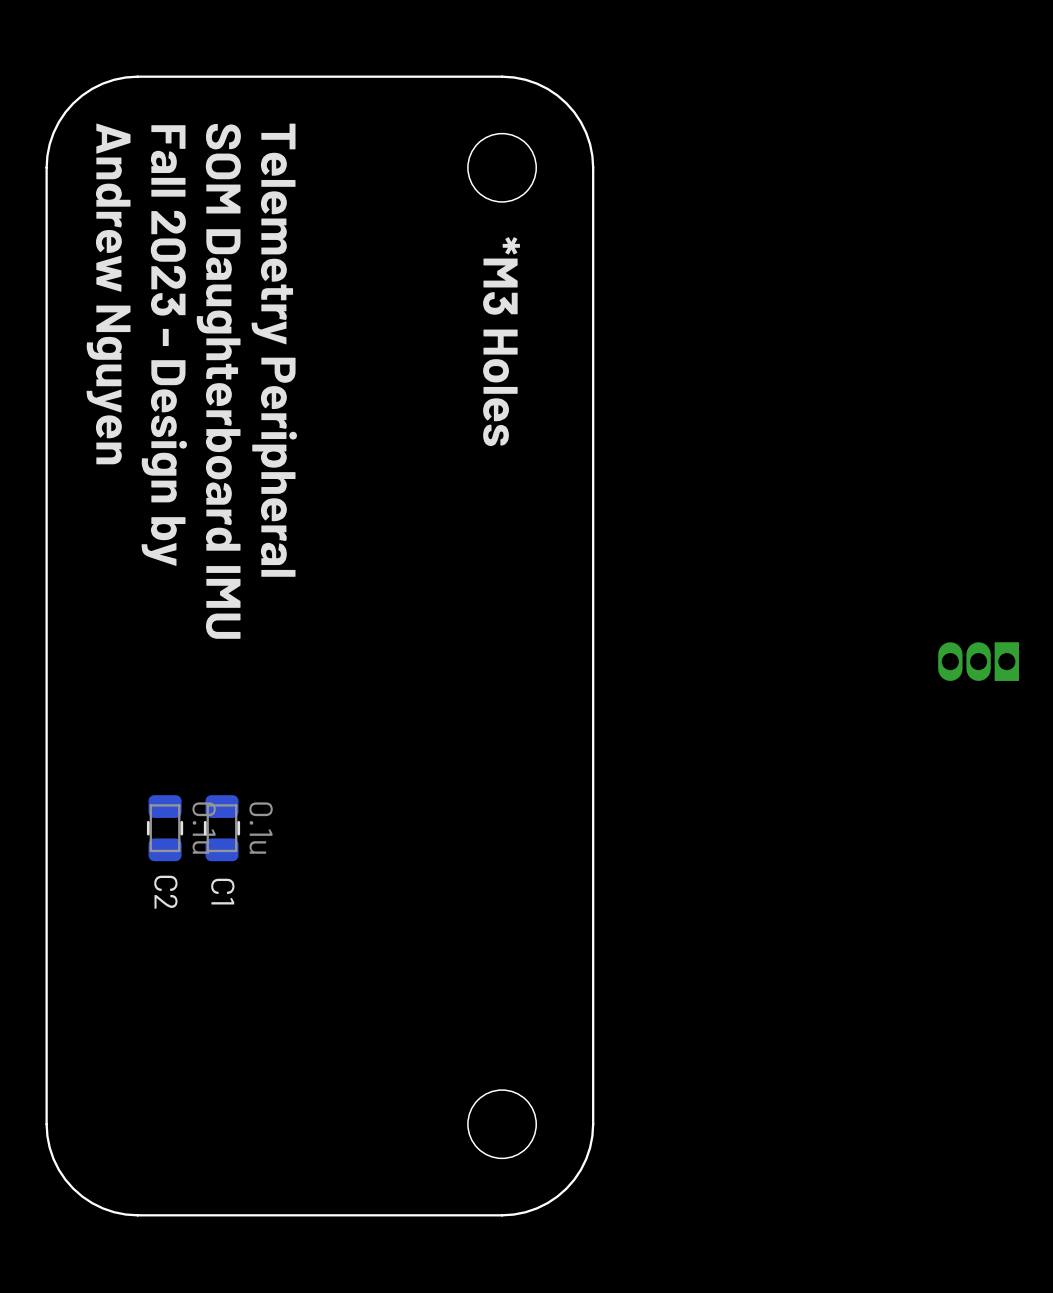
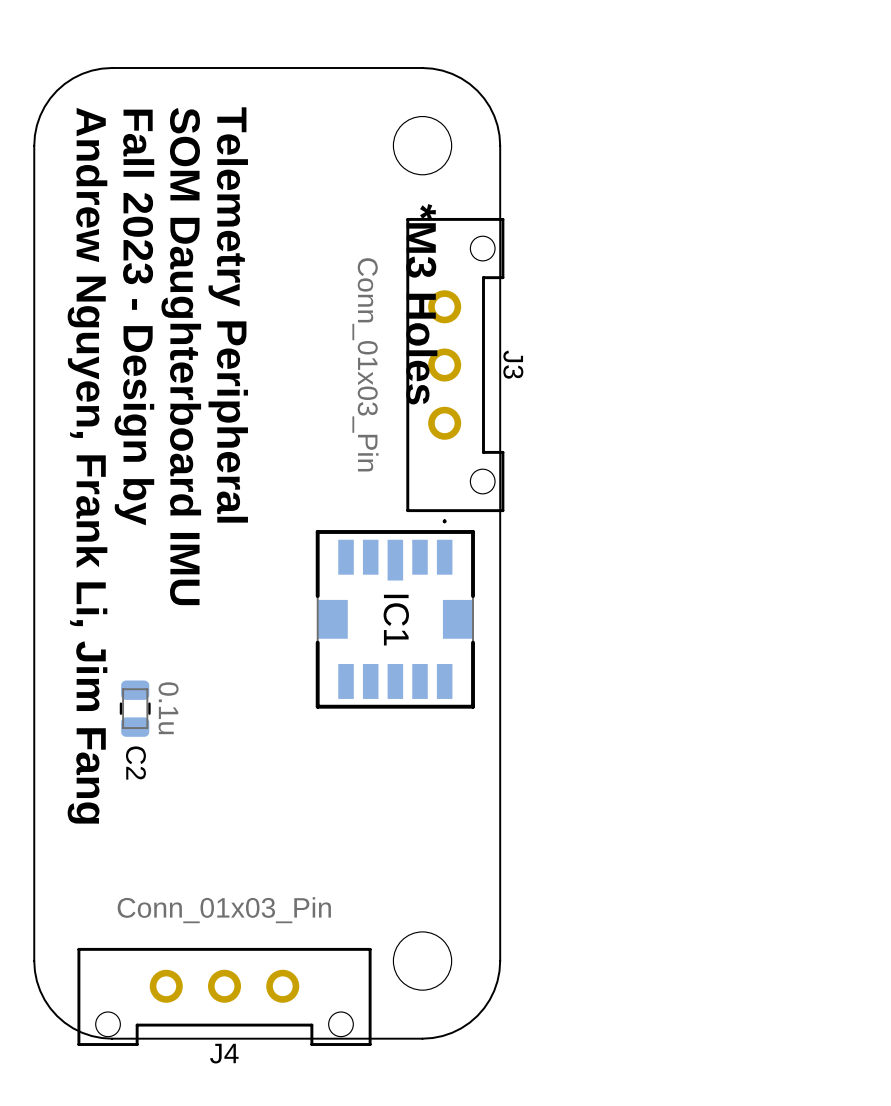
text: Andrew Nguyen (108, 293) -> Andrew Nguyen, Frank Li, Jim Fang (87, 465)
J3: none -> Conn_01x03_Pin (455, 365)
part: (978, 661) -> none
IC1: none -> (395, 614)
C1: 0.1u (221, 828) -> none
J4: none -> Conn_01x03_Pin (224, 996)

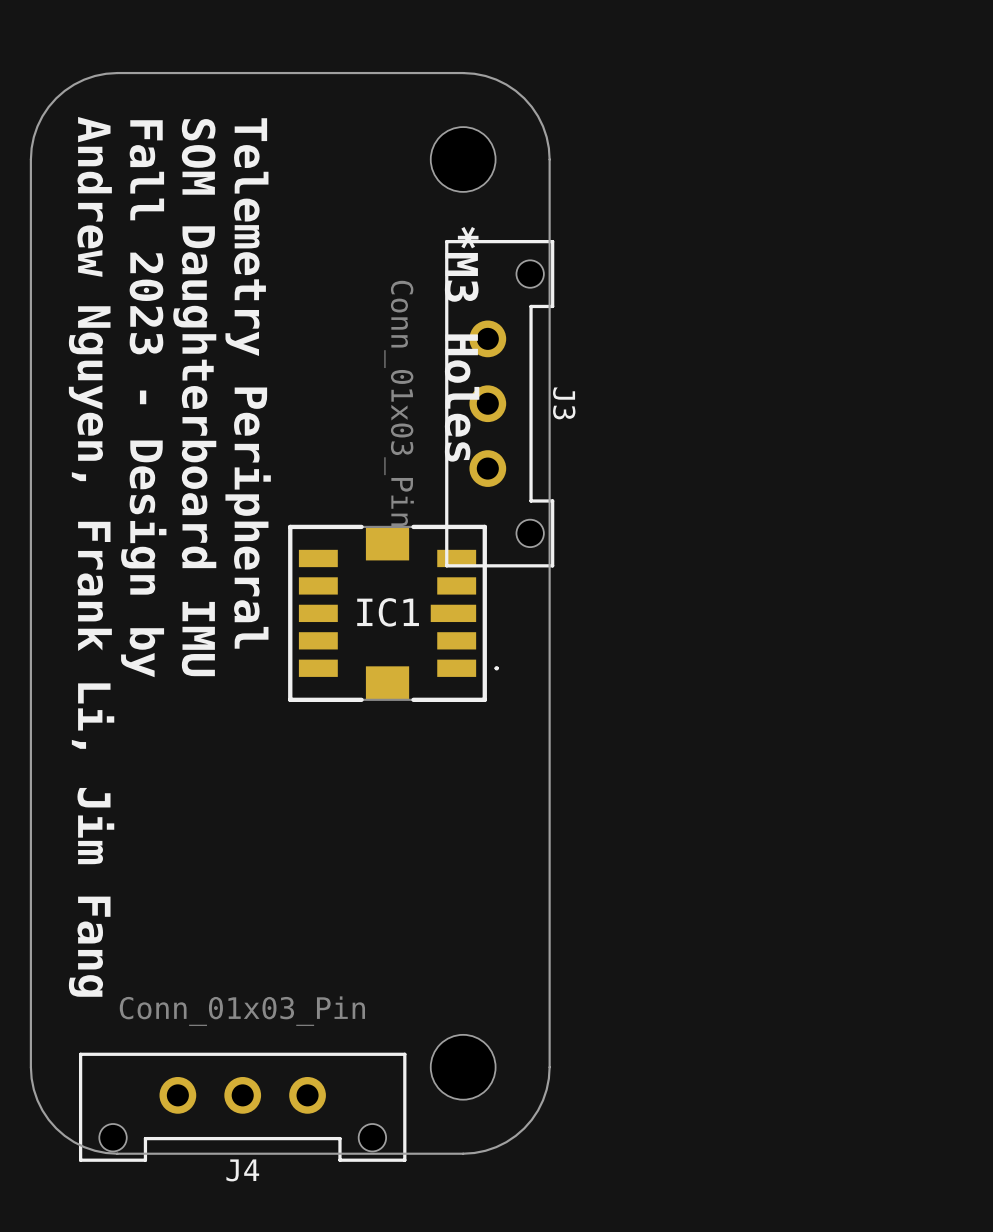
IC1 rotation: 0° (395, 614) -> 90° clockwise (393, 613)
C2: 0.1u (135, 708) -> none

